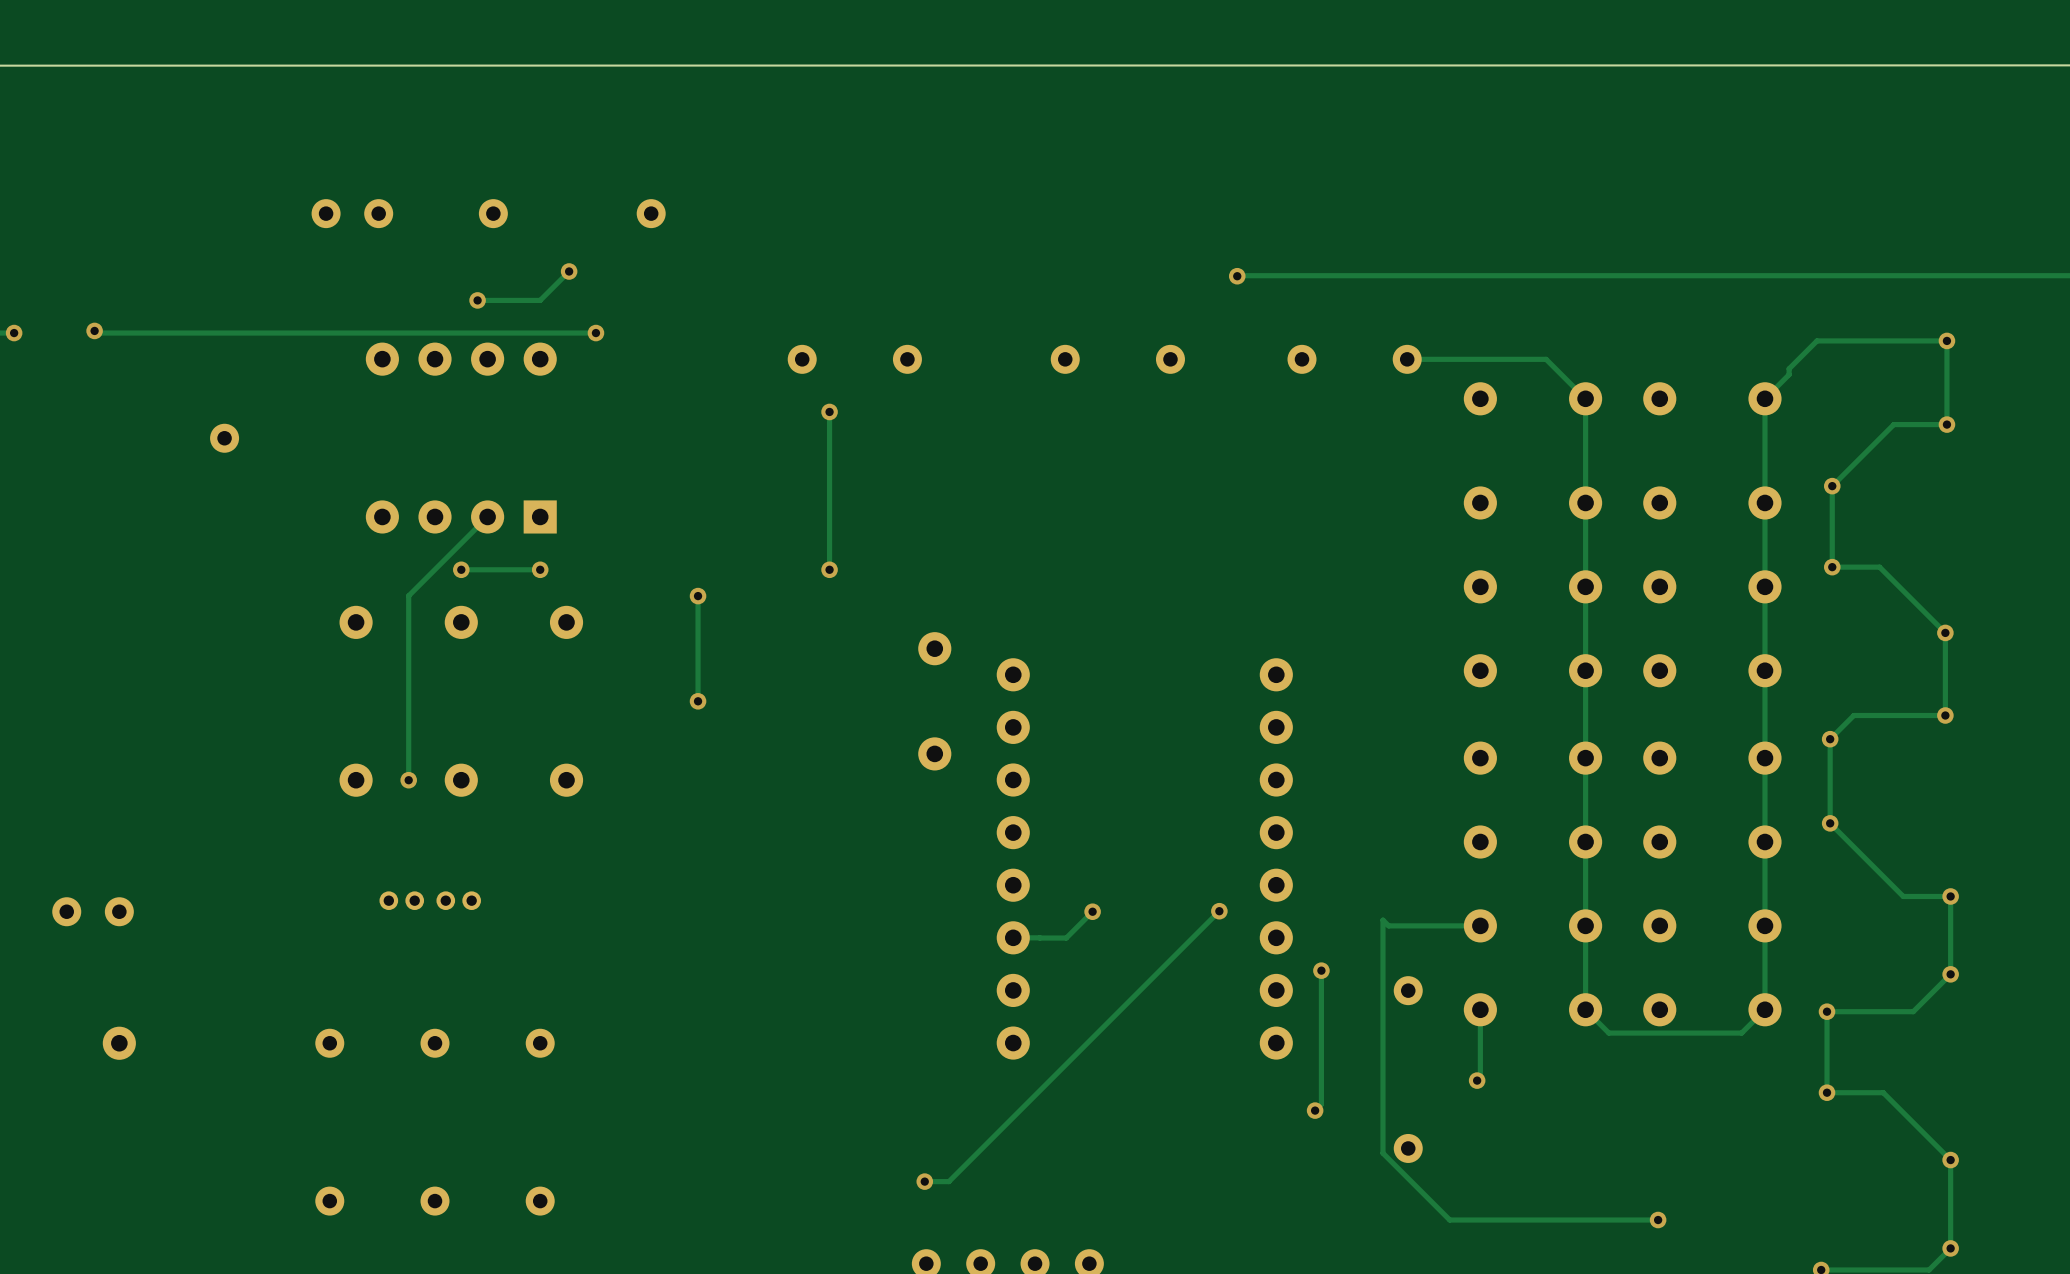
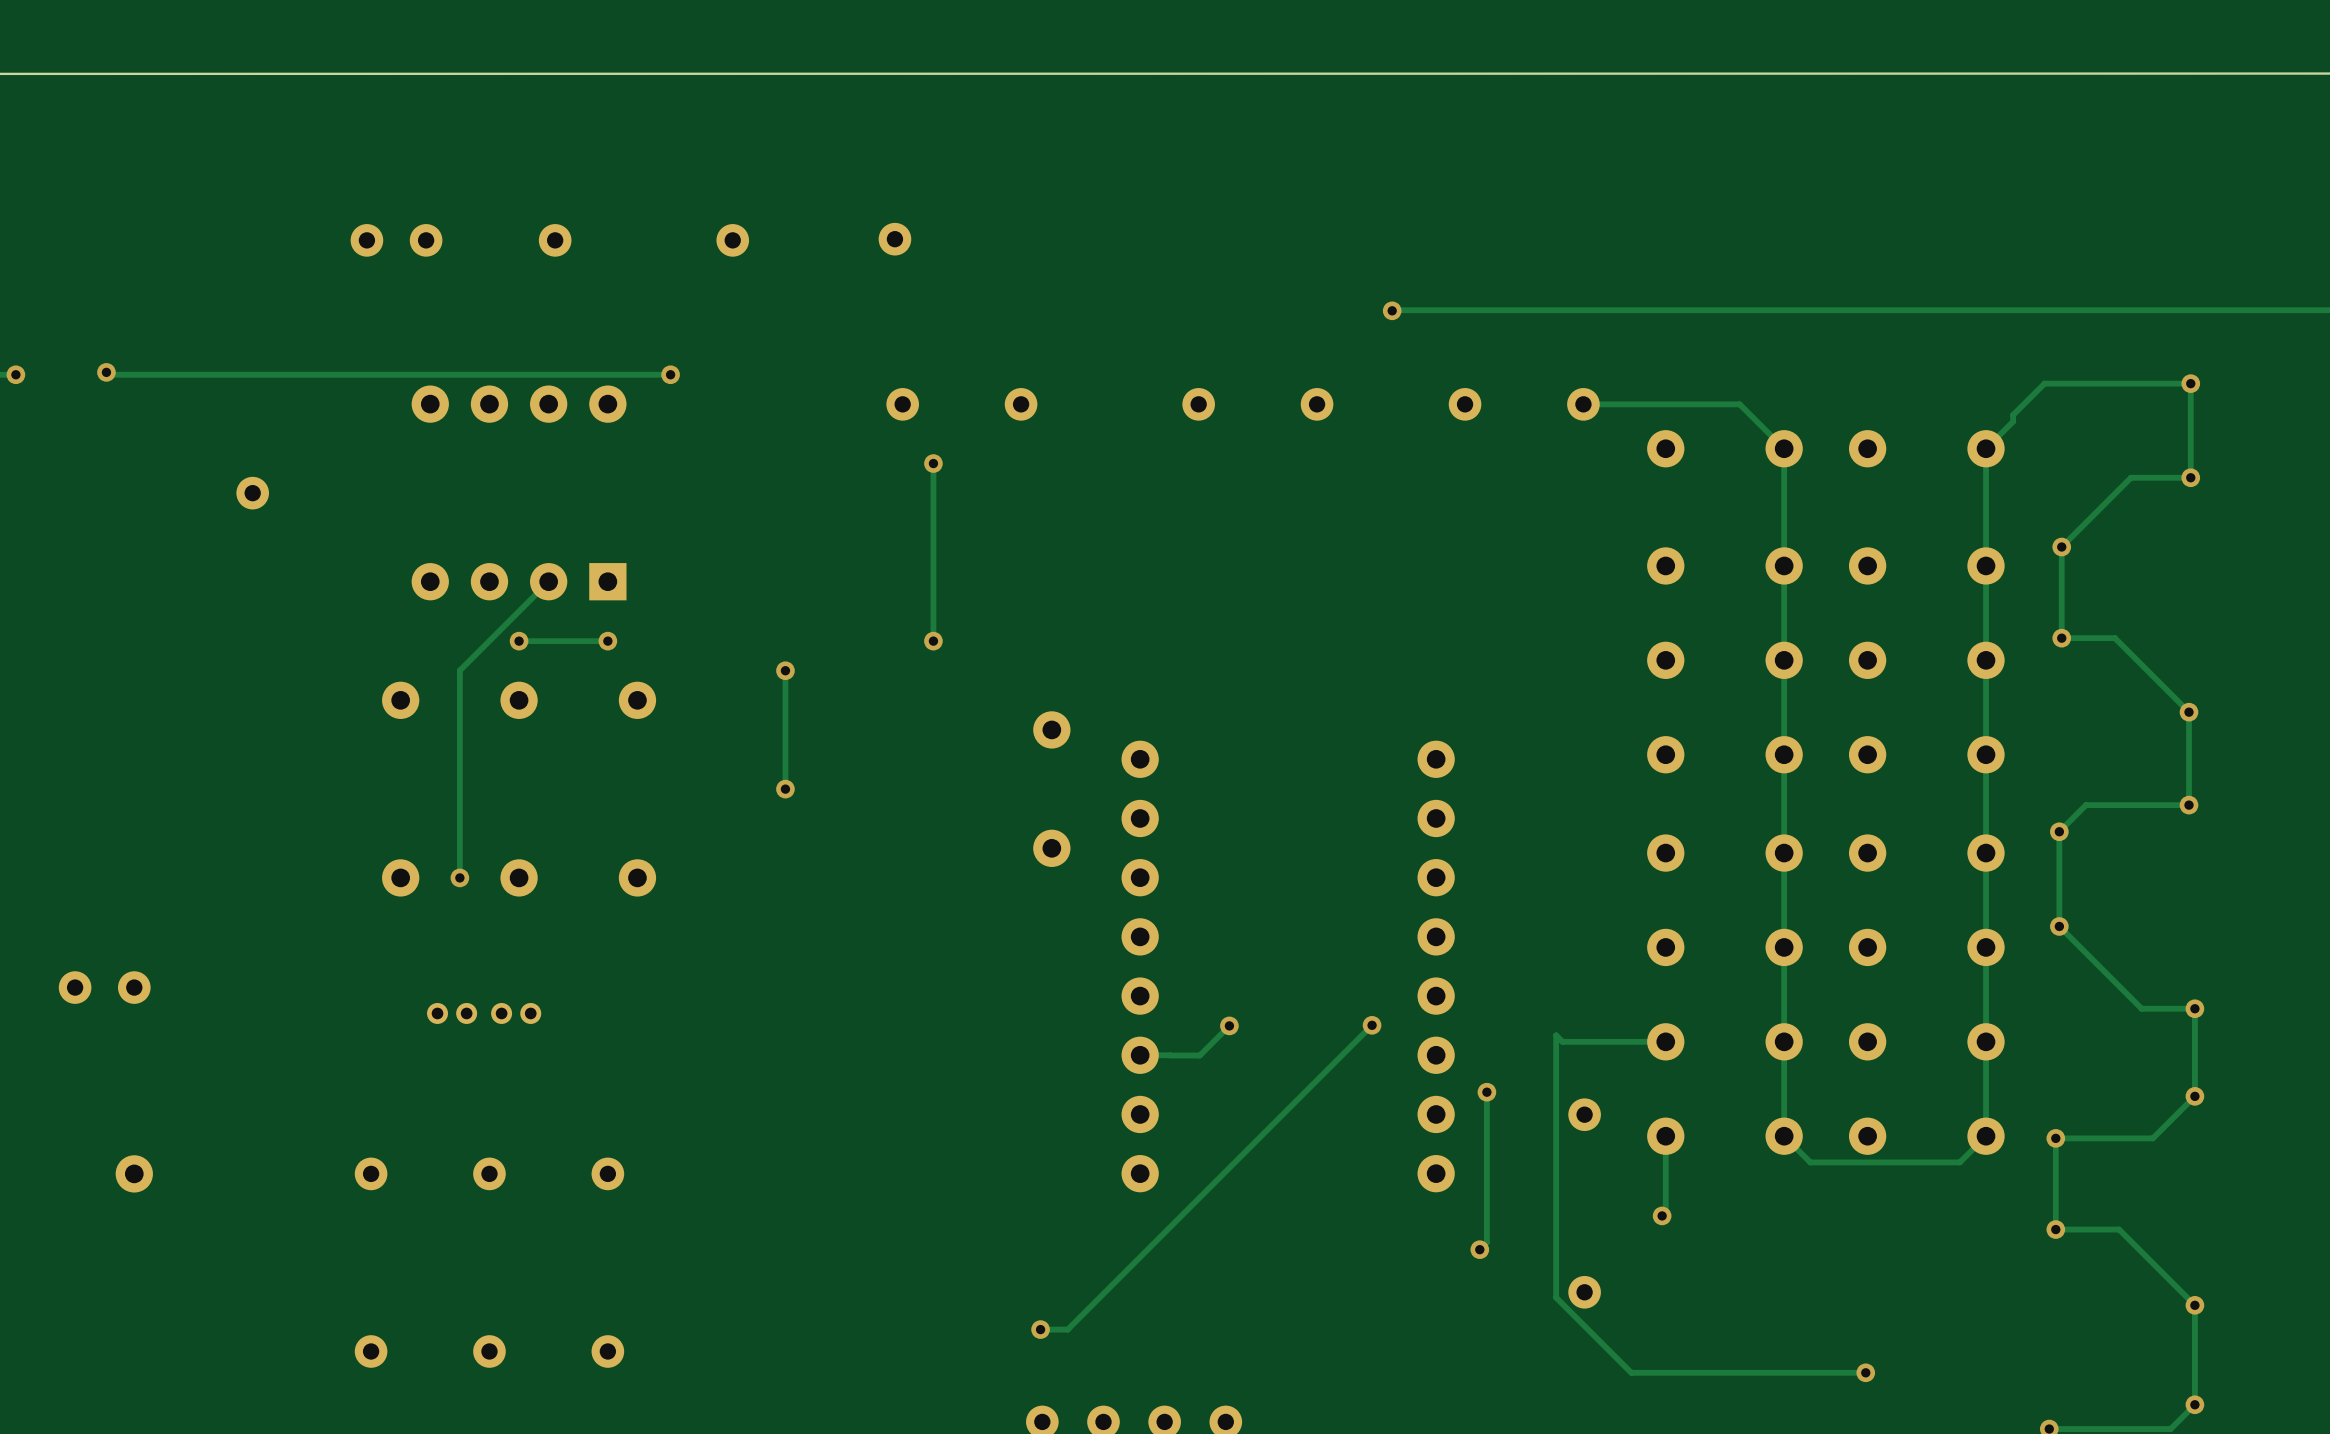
part: none -> (894, 239)
track: (569, 271) (540, 300) (477, 300) -> none
via: (569, 271) -> none
via: (477, 300) -> none
part position: (93, 911) -> (104, 987)

